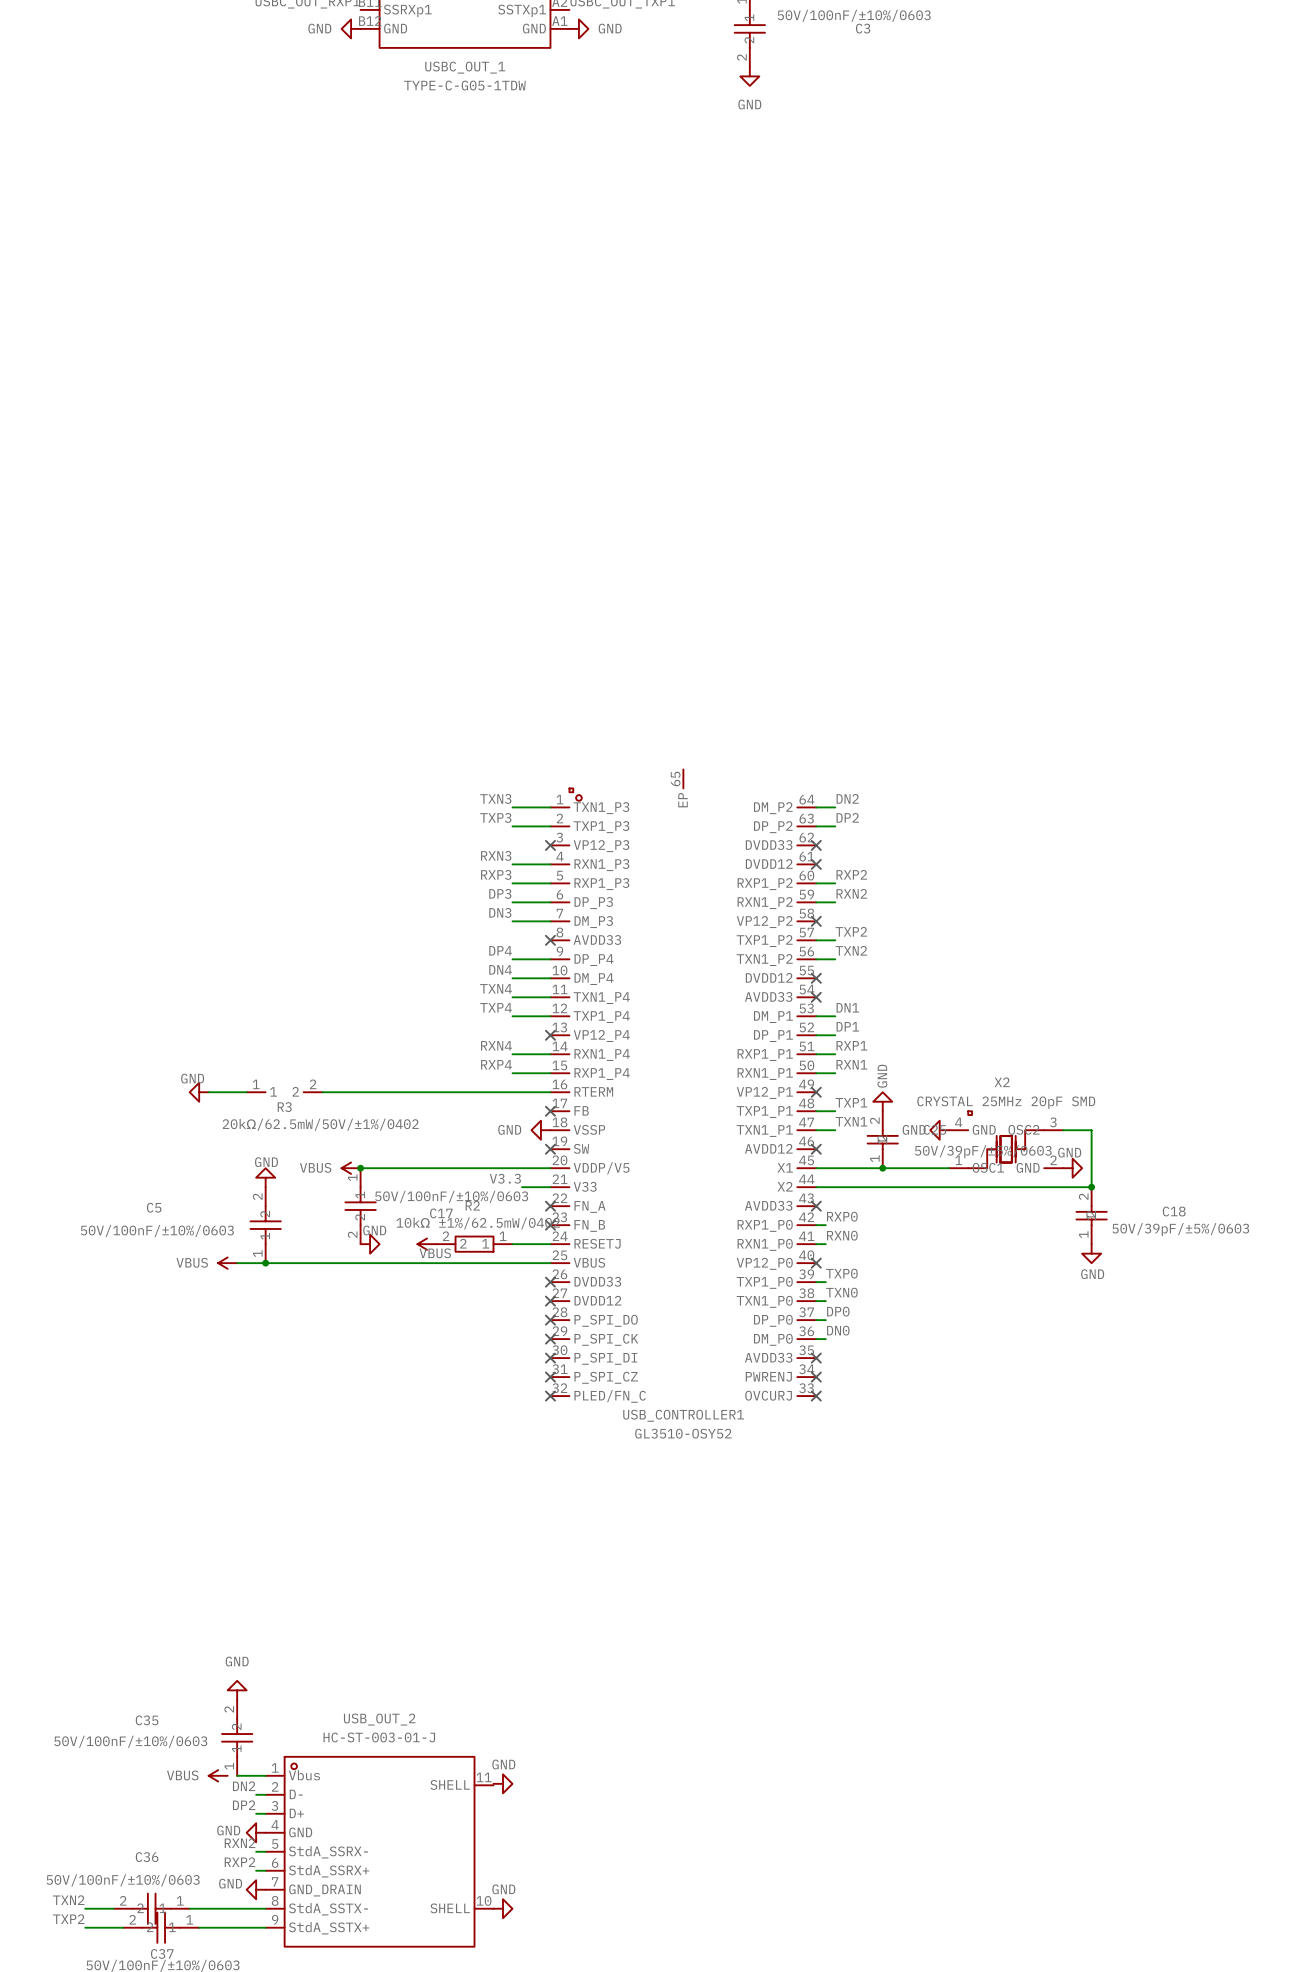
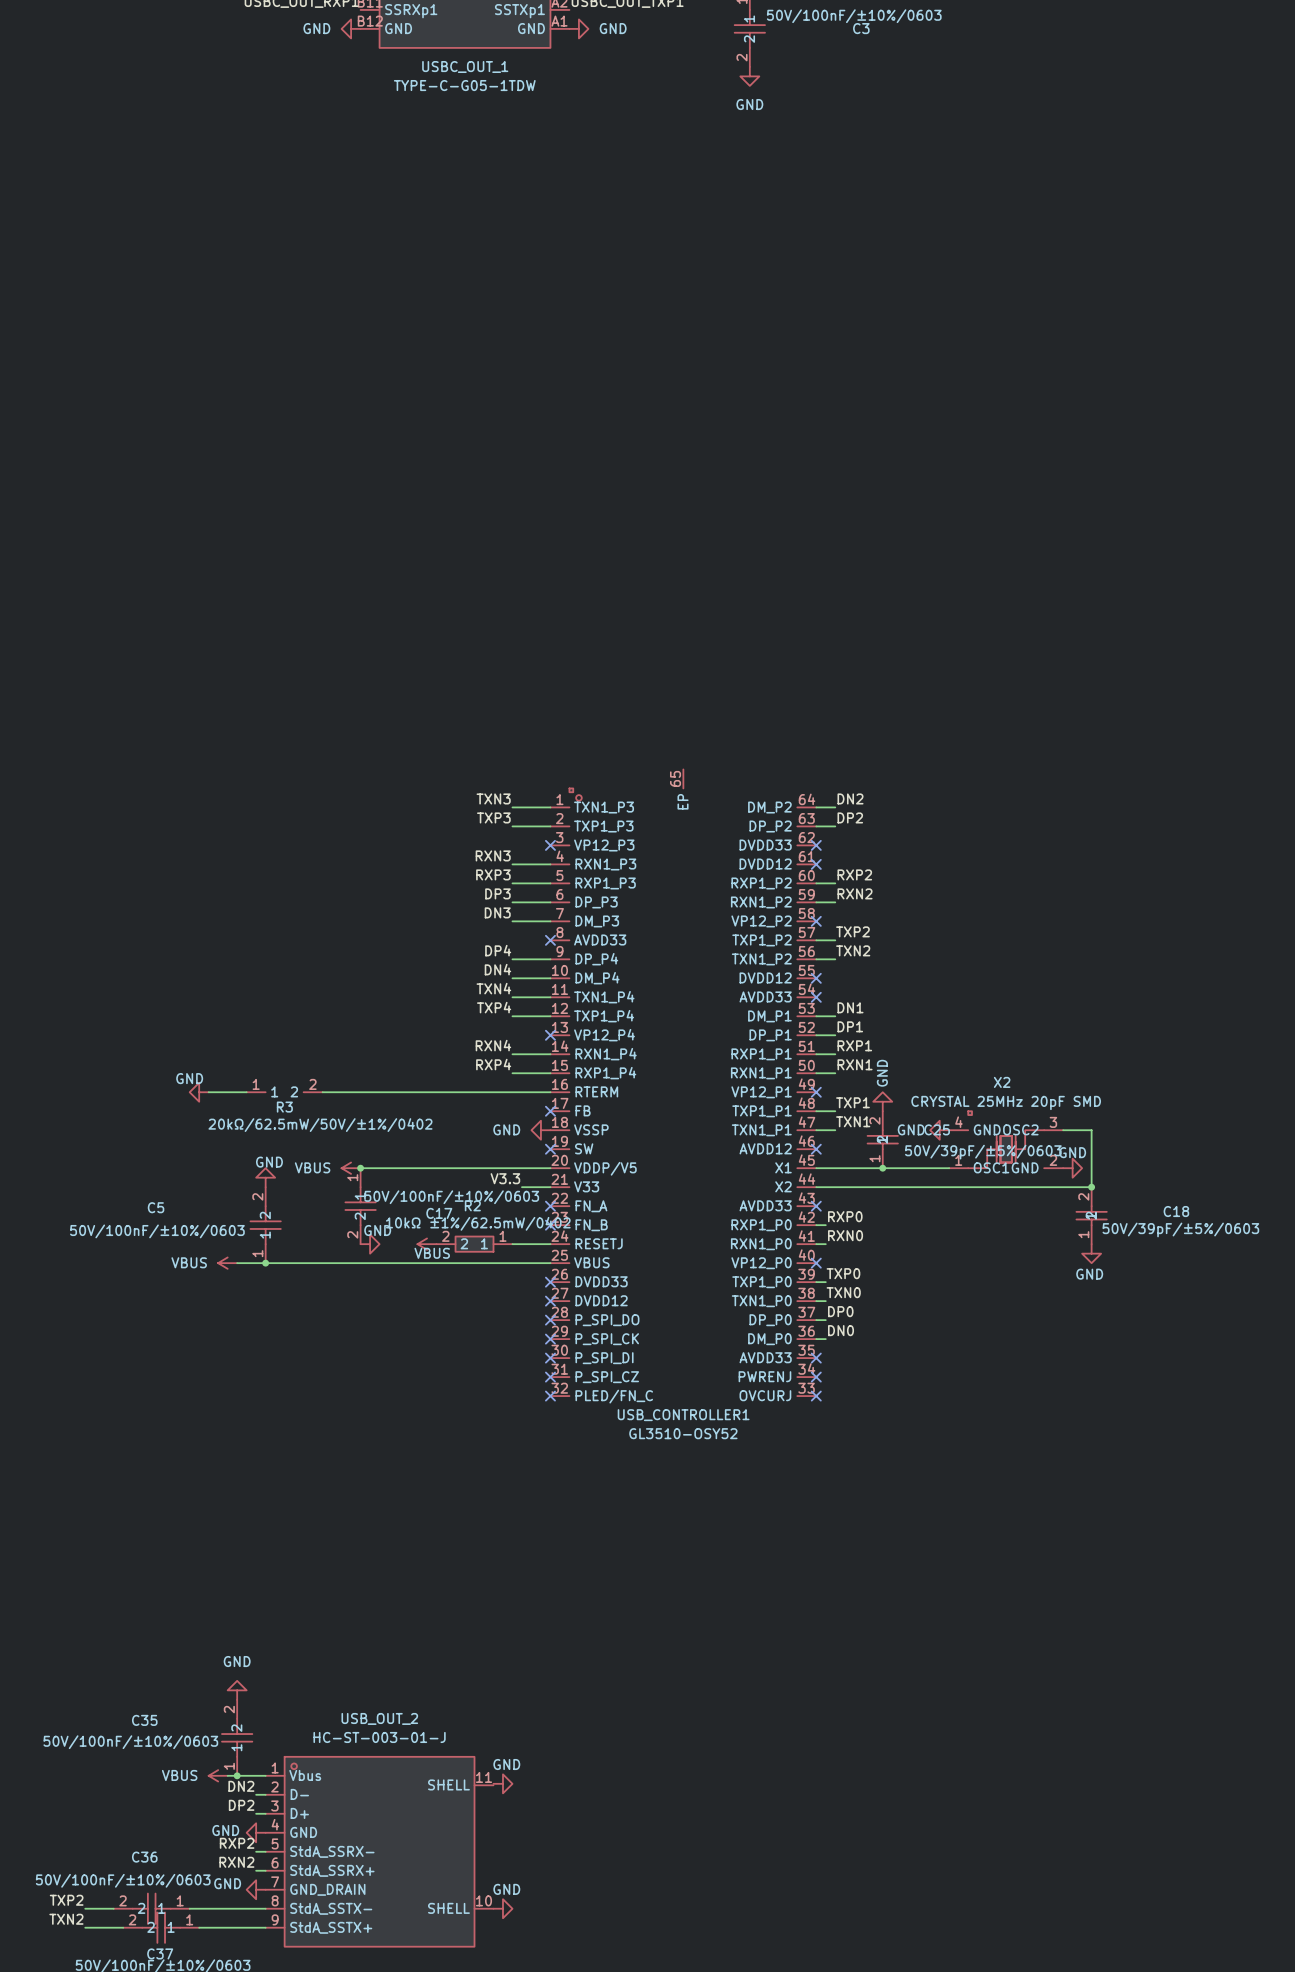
wire: none -> (227, 1775) (237, 1775)
junction: none -> (237, 1775)
label: RXN2 (240, 1843) -> RXP2 (237, 1843)
label: RXP2 (240, 1862) -> RXN2 (236, 1862)
label: TXN2 (68, 1900) -> TXP2 (66, 1900)
label: TXP2 (68, 1919) -> TXN2 (66, 1919)

